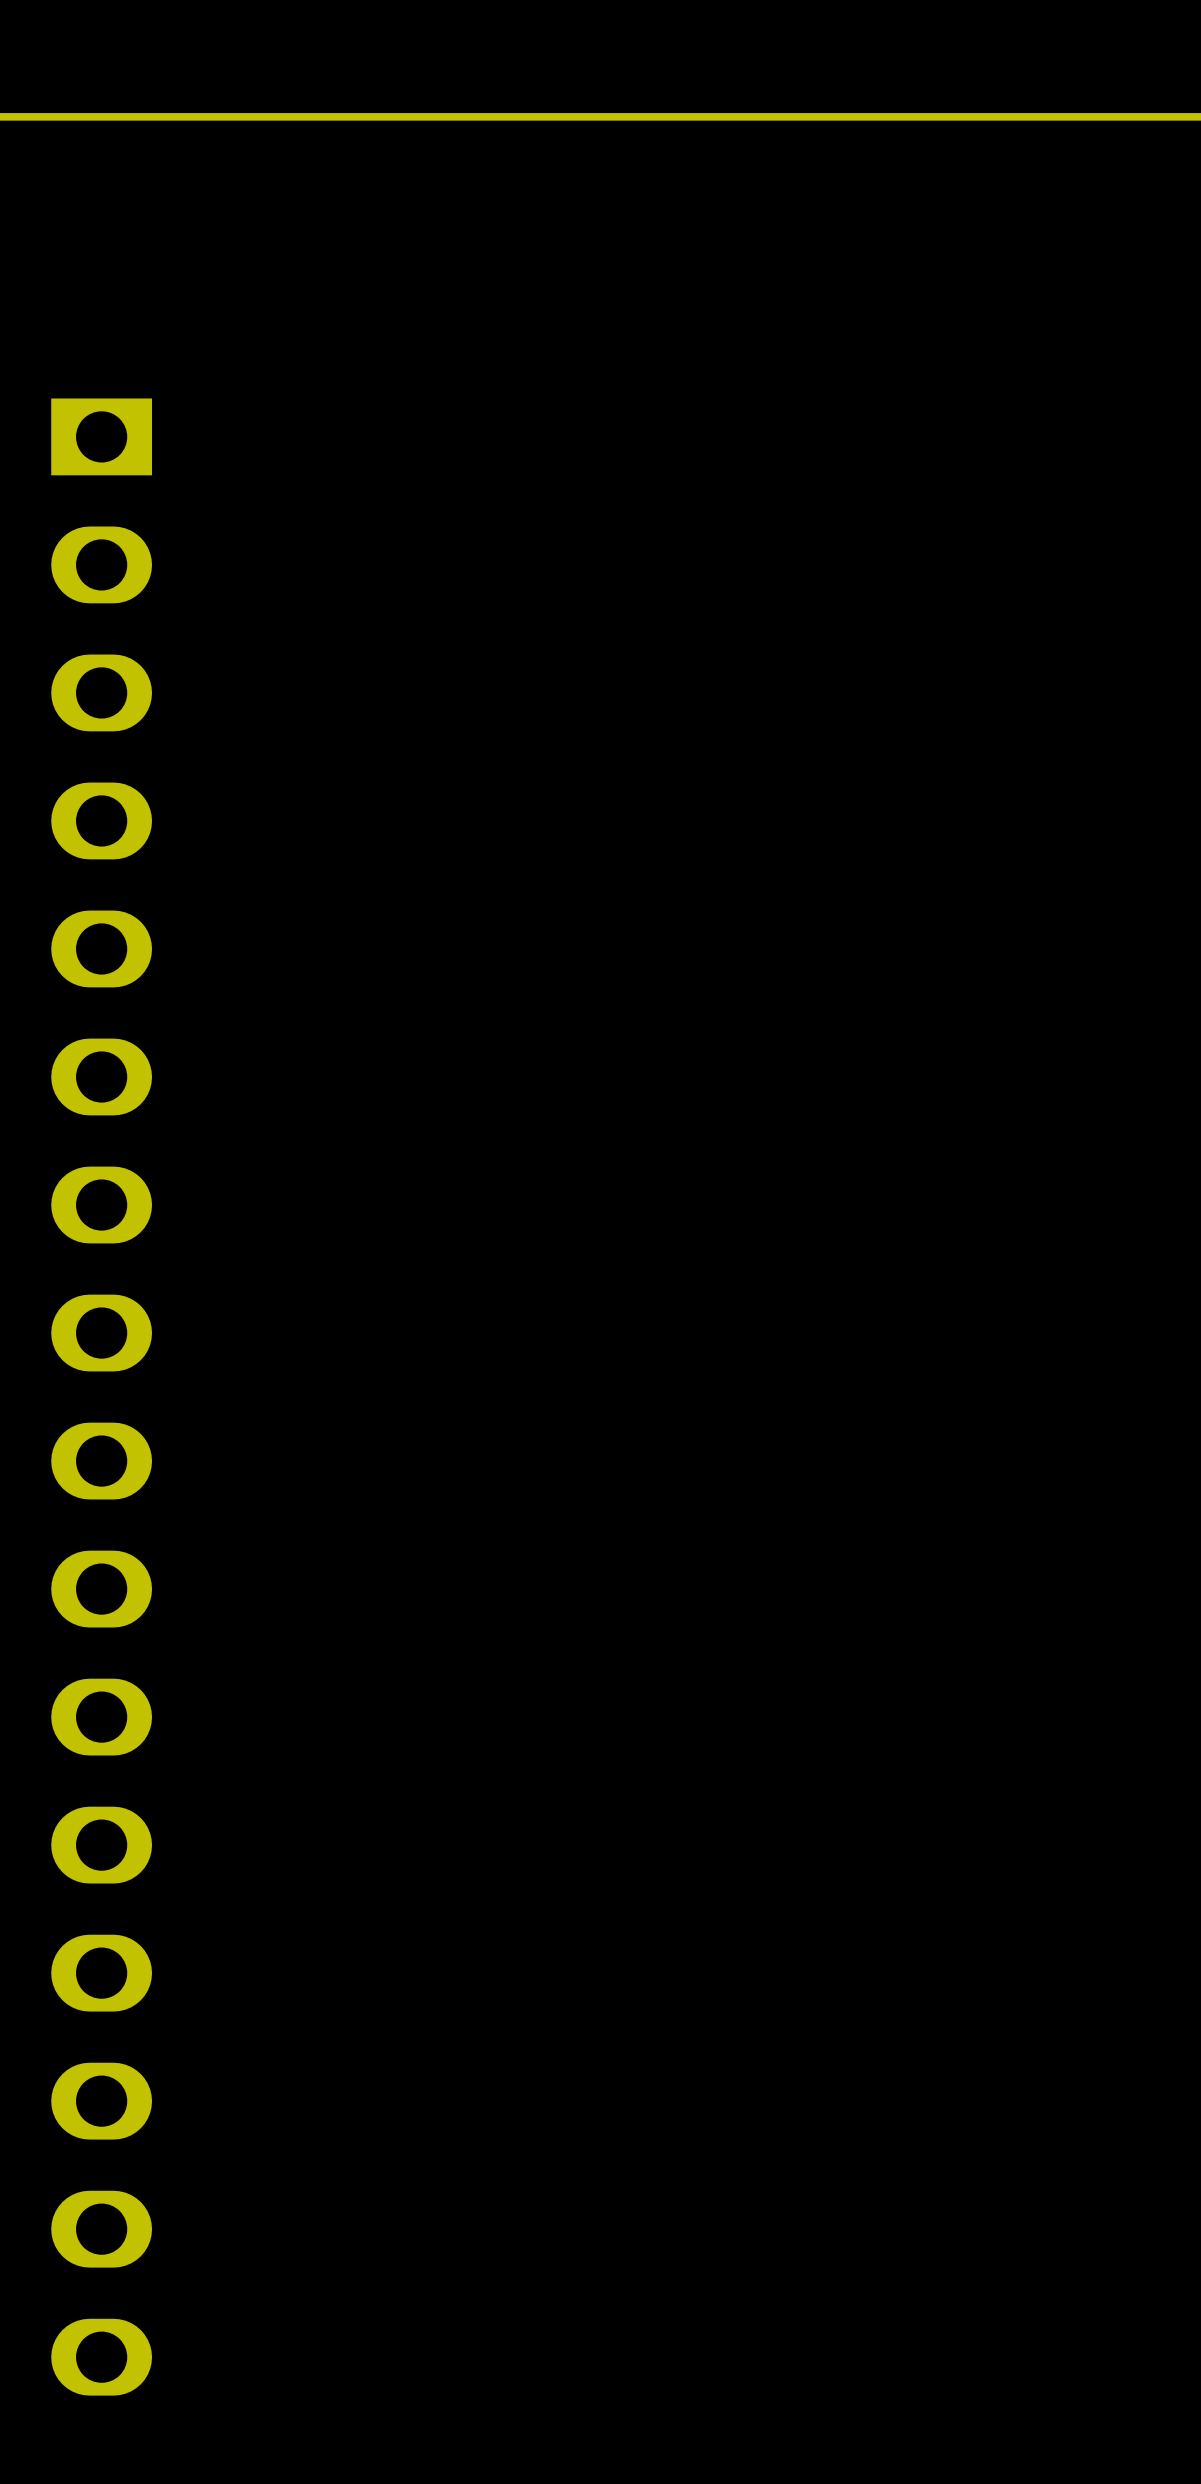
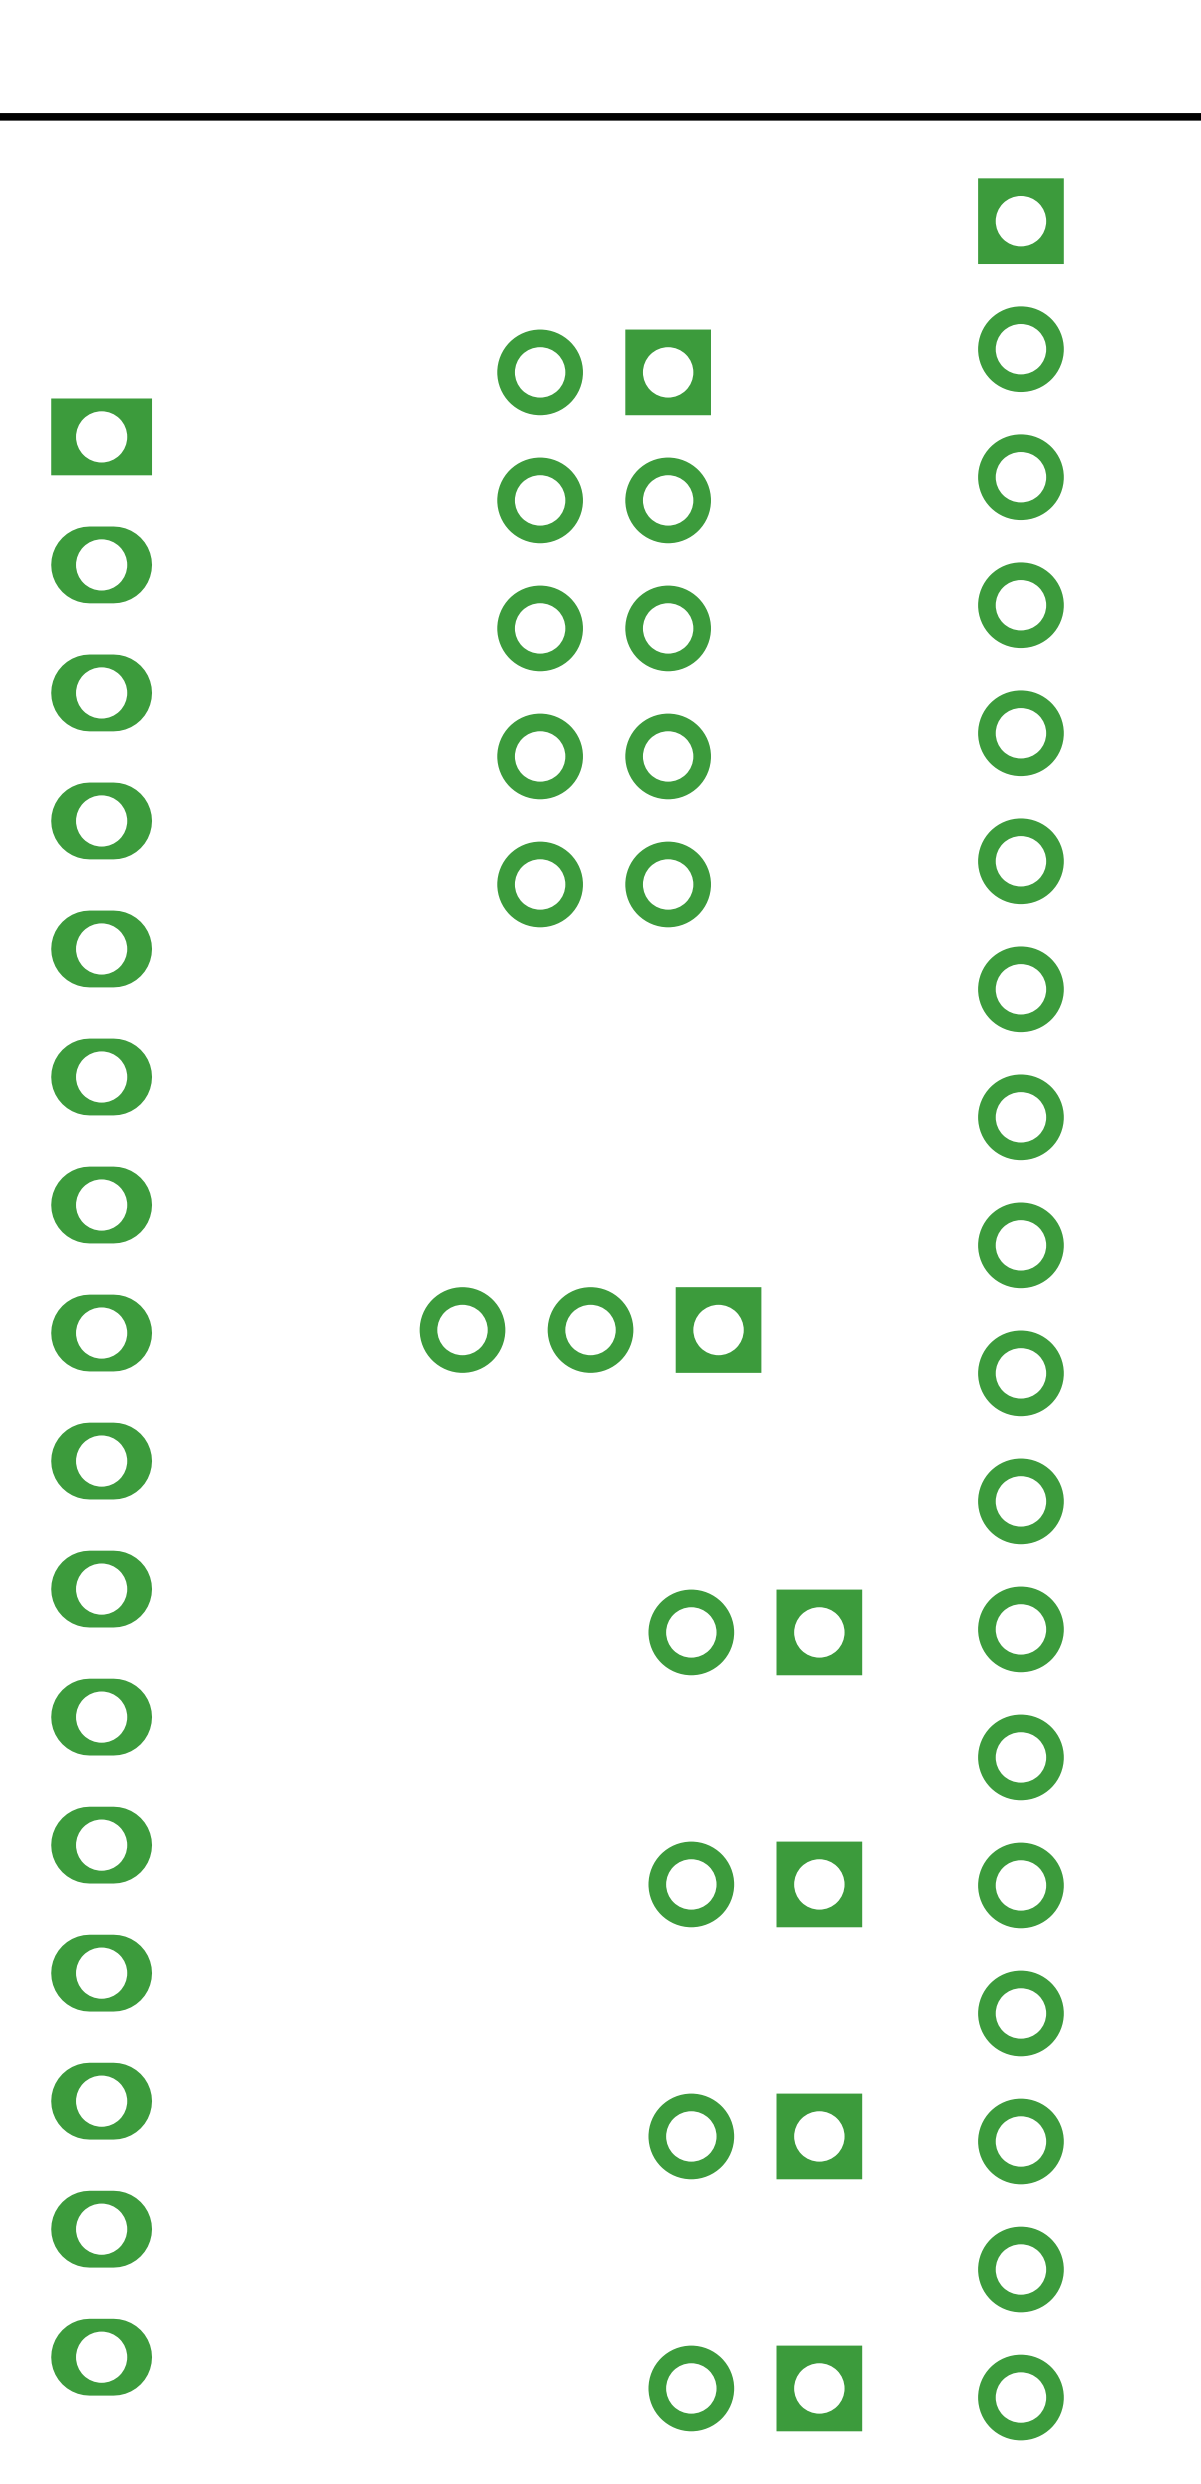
part: none -> (604, 628)
part: none -> (1020, 1309)
part: none -> (590, 1330)
part: none -> (755, 1632)
part: none -> (755, 1884)
part: none -> (755, 2136)
part: none -> (755, 2388)

